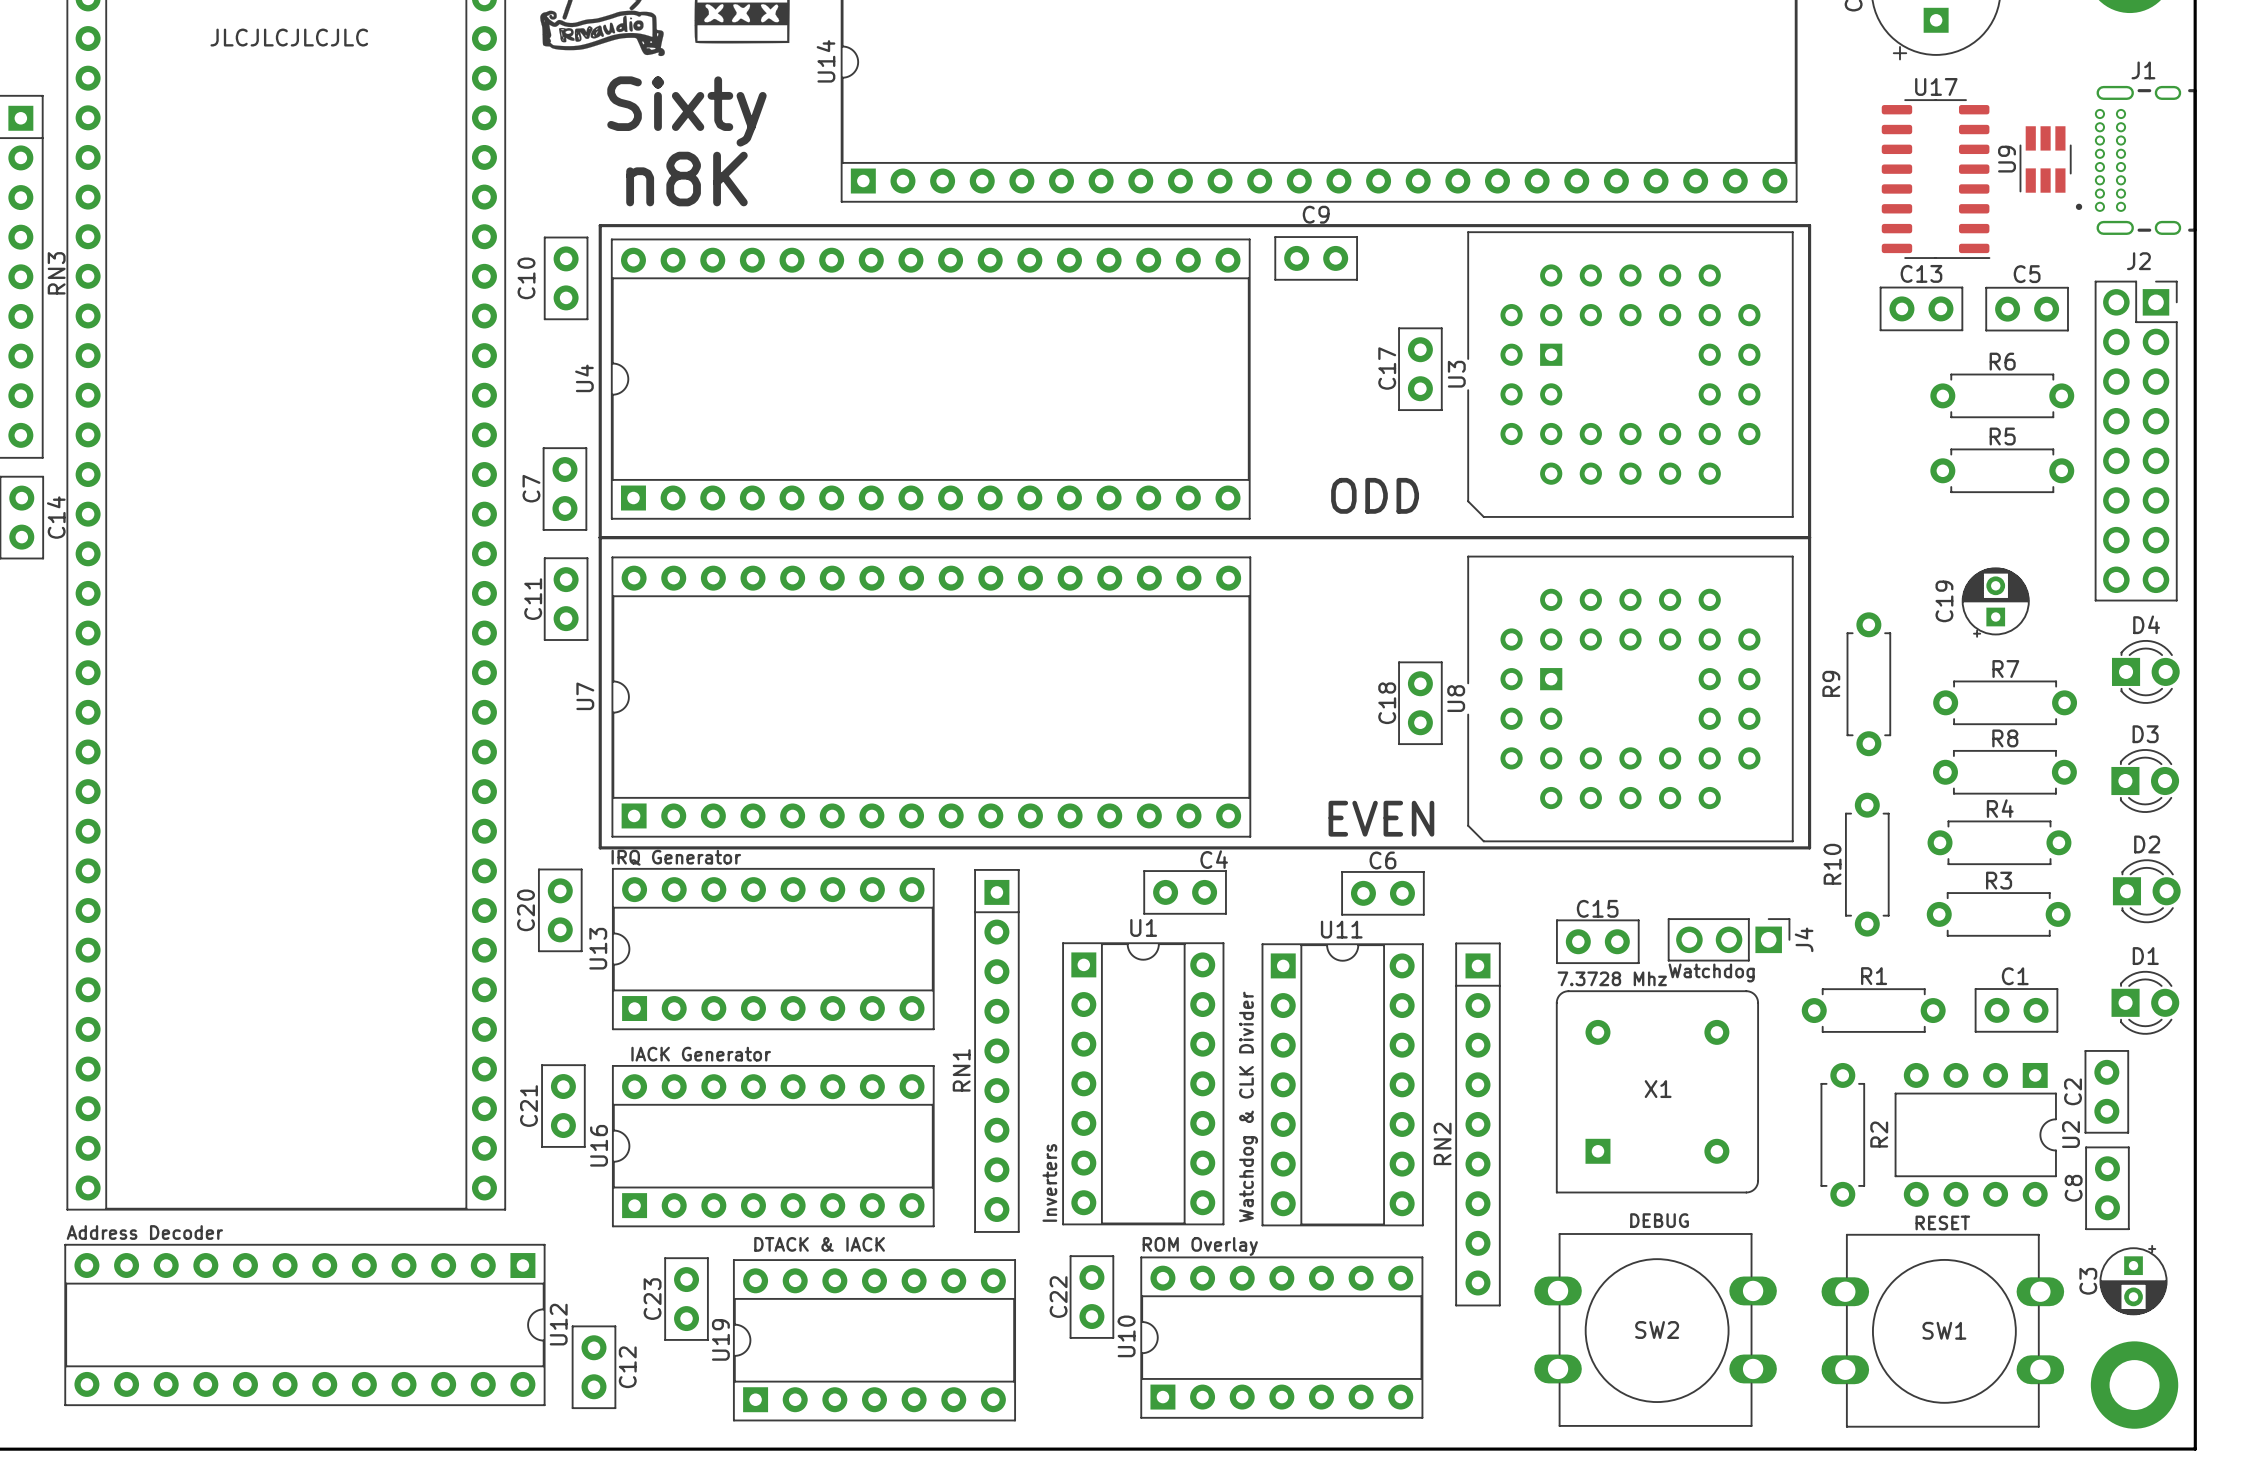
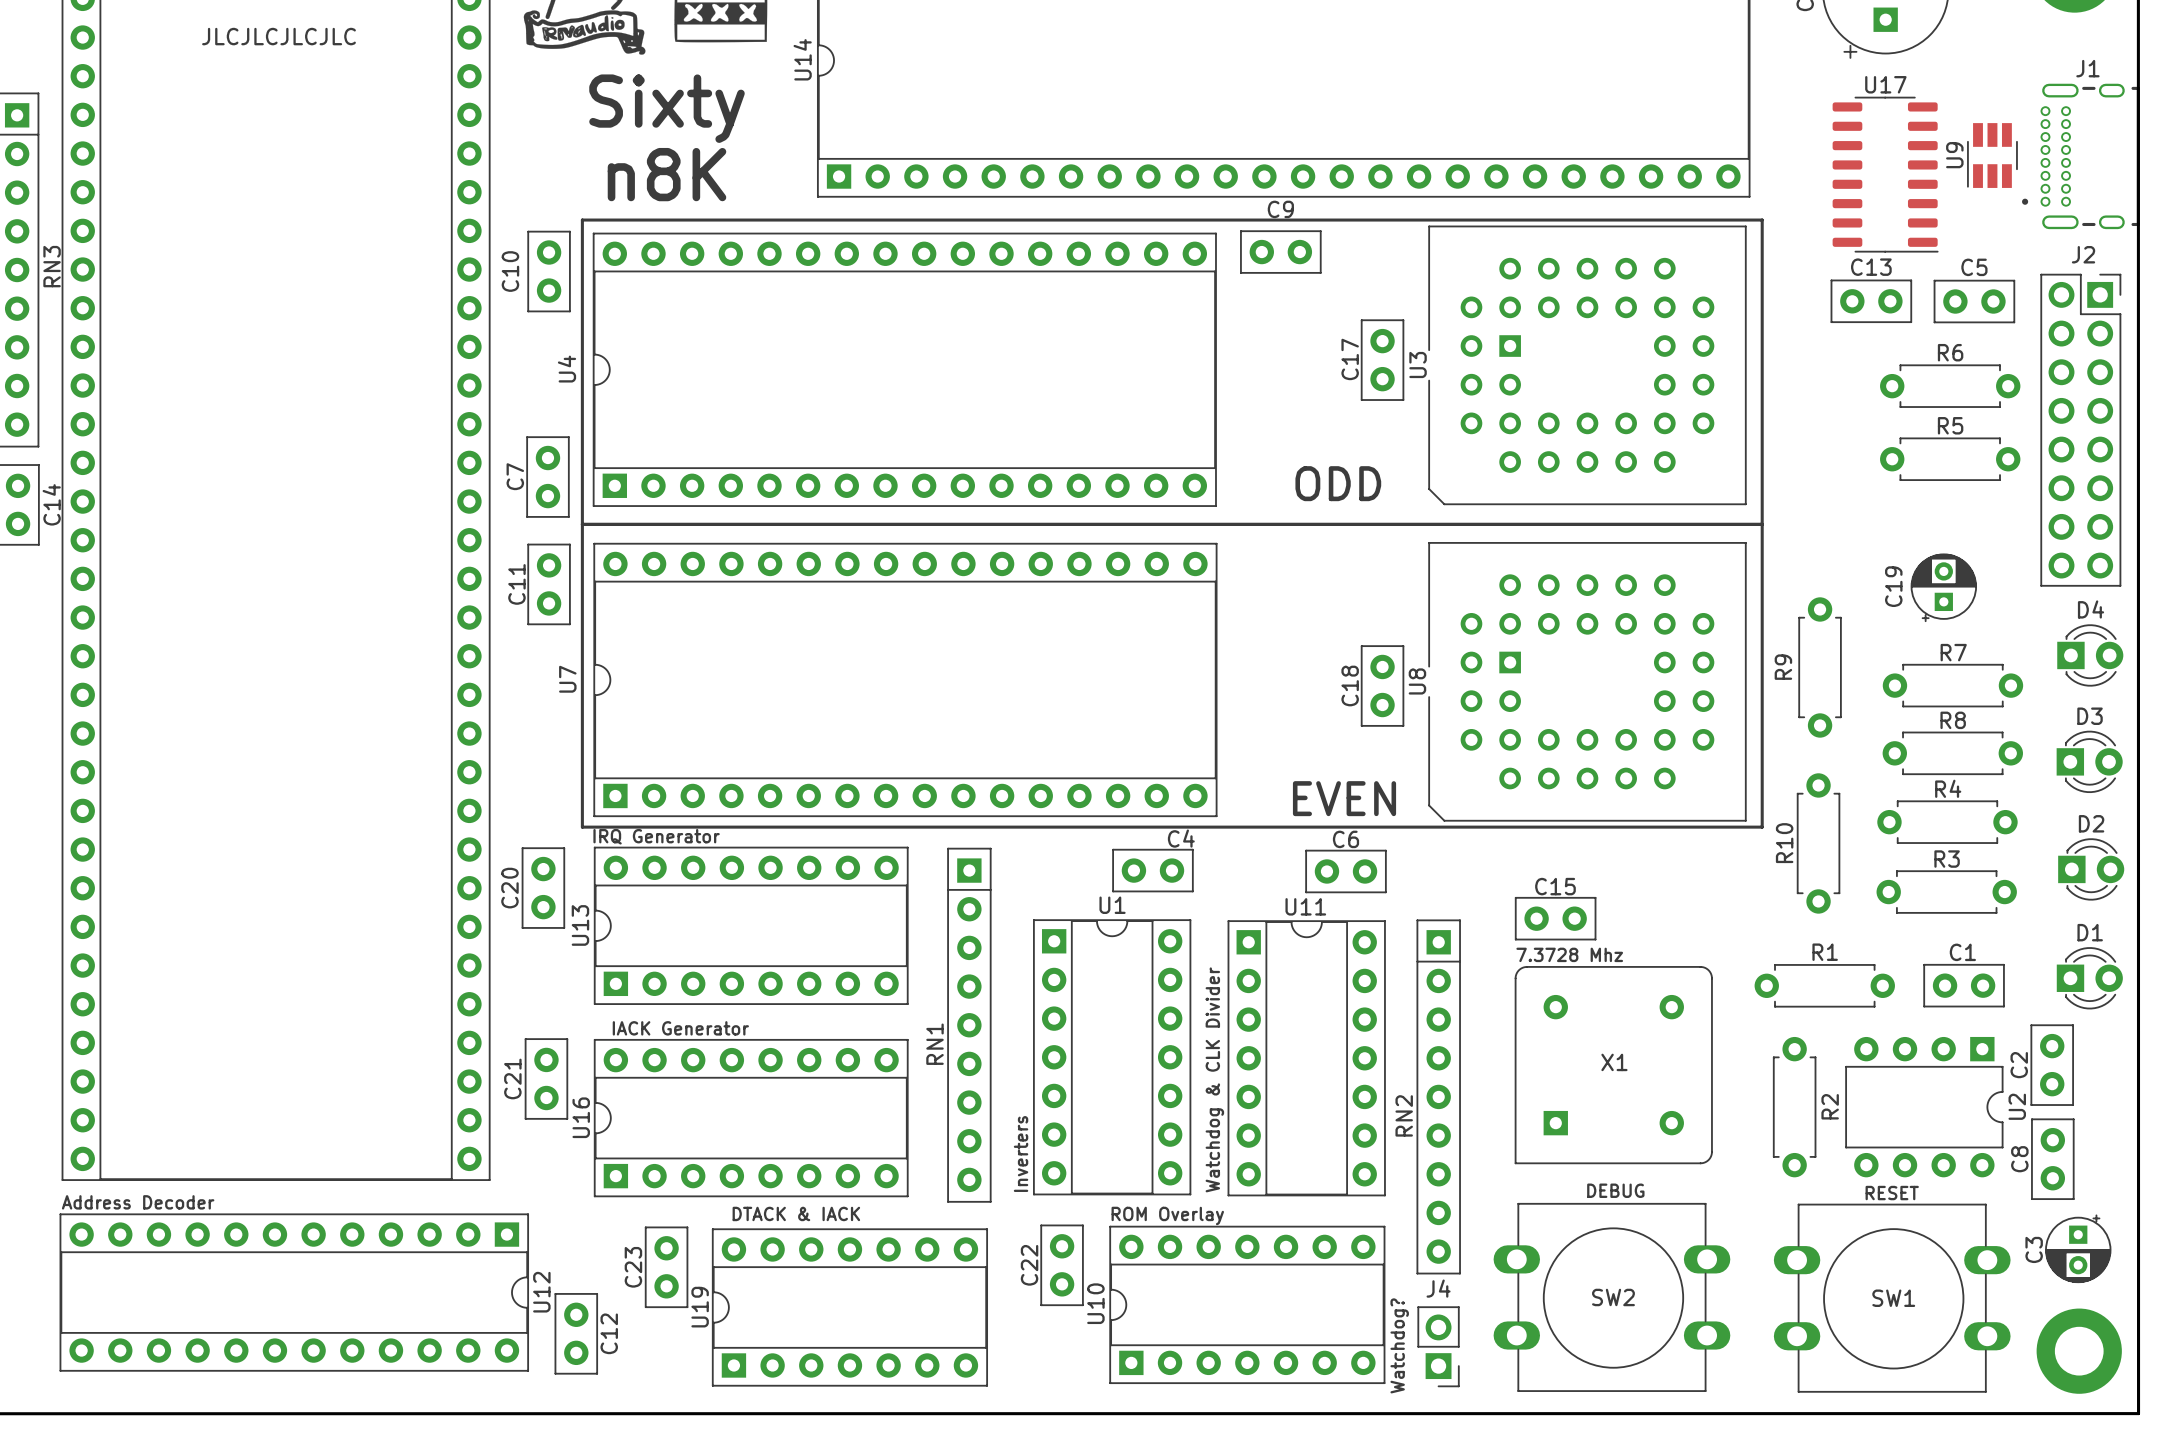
J4 footprint: [1667, 918, 1791, 962] -> [1417, 1306, 1460, 1388]
J4 name position: J4 (1804, 939) -> J4 (1438, 1288)
text: Watchdog (1711, 972) -> none
text: none -> Watchdog? (1399, 1345)

